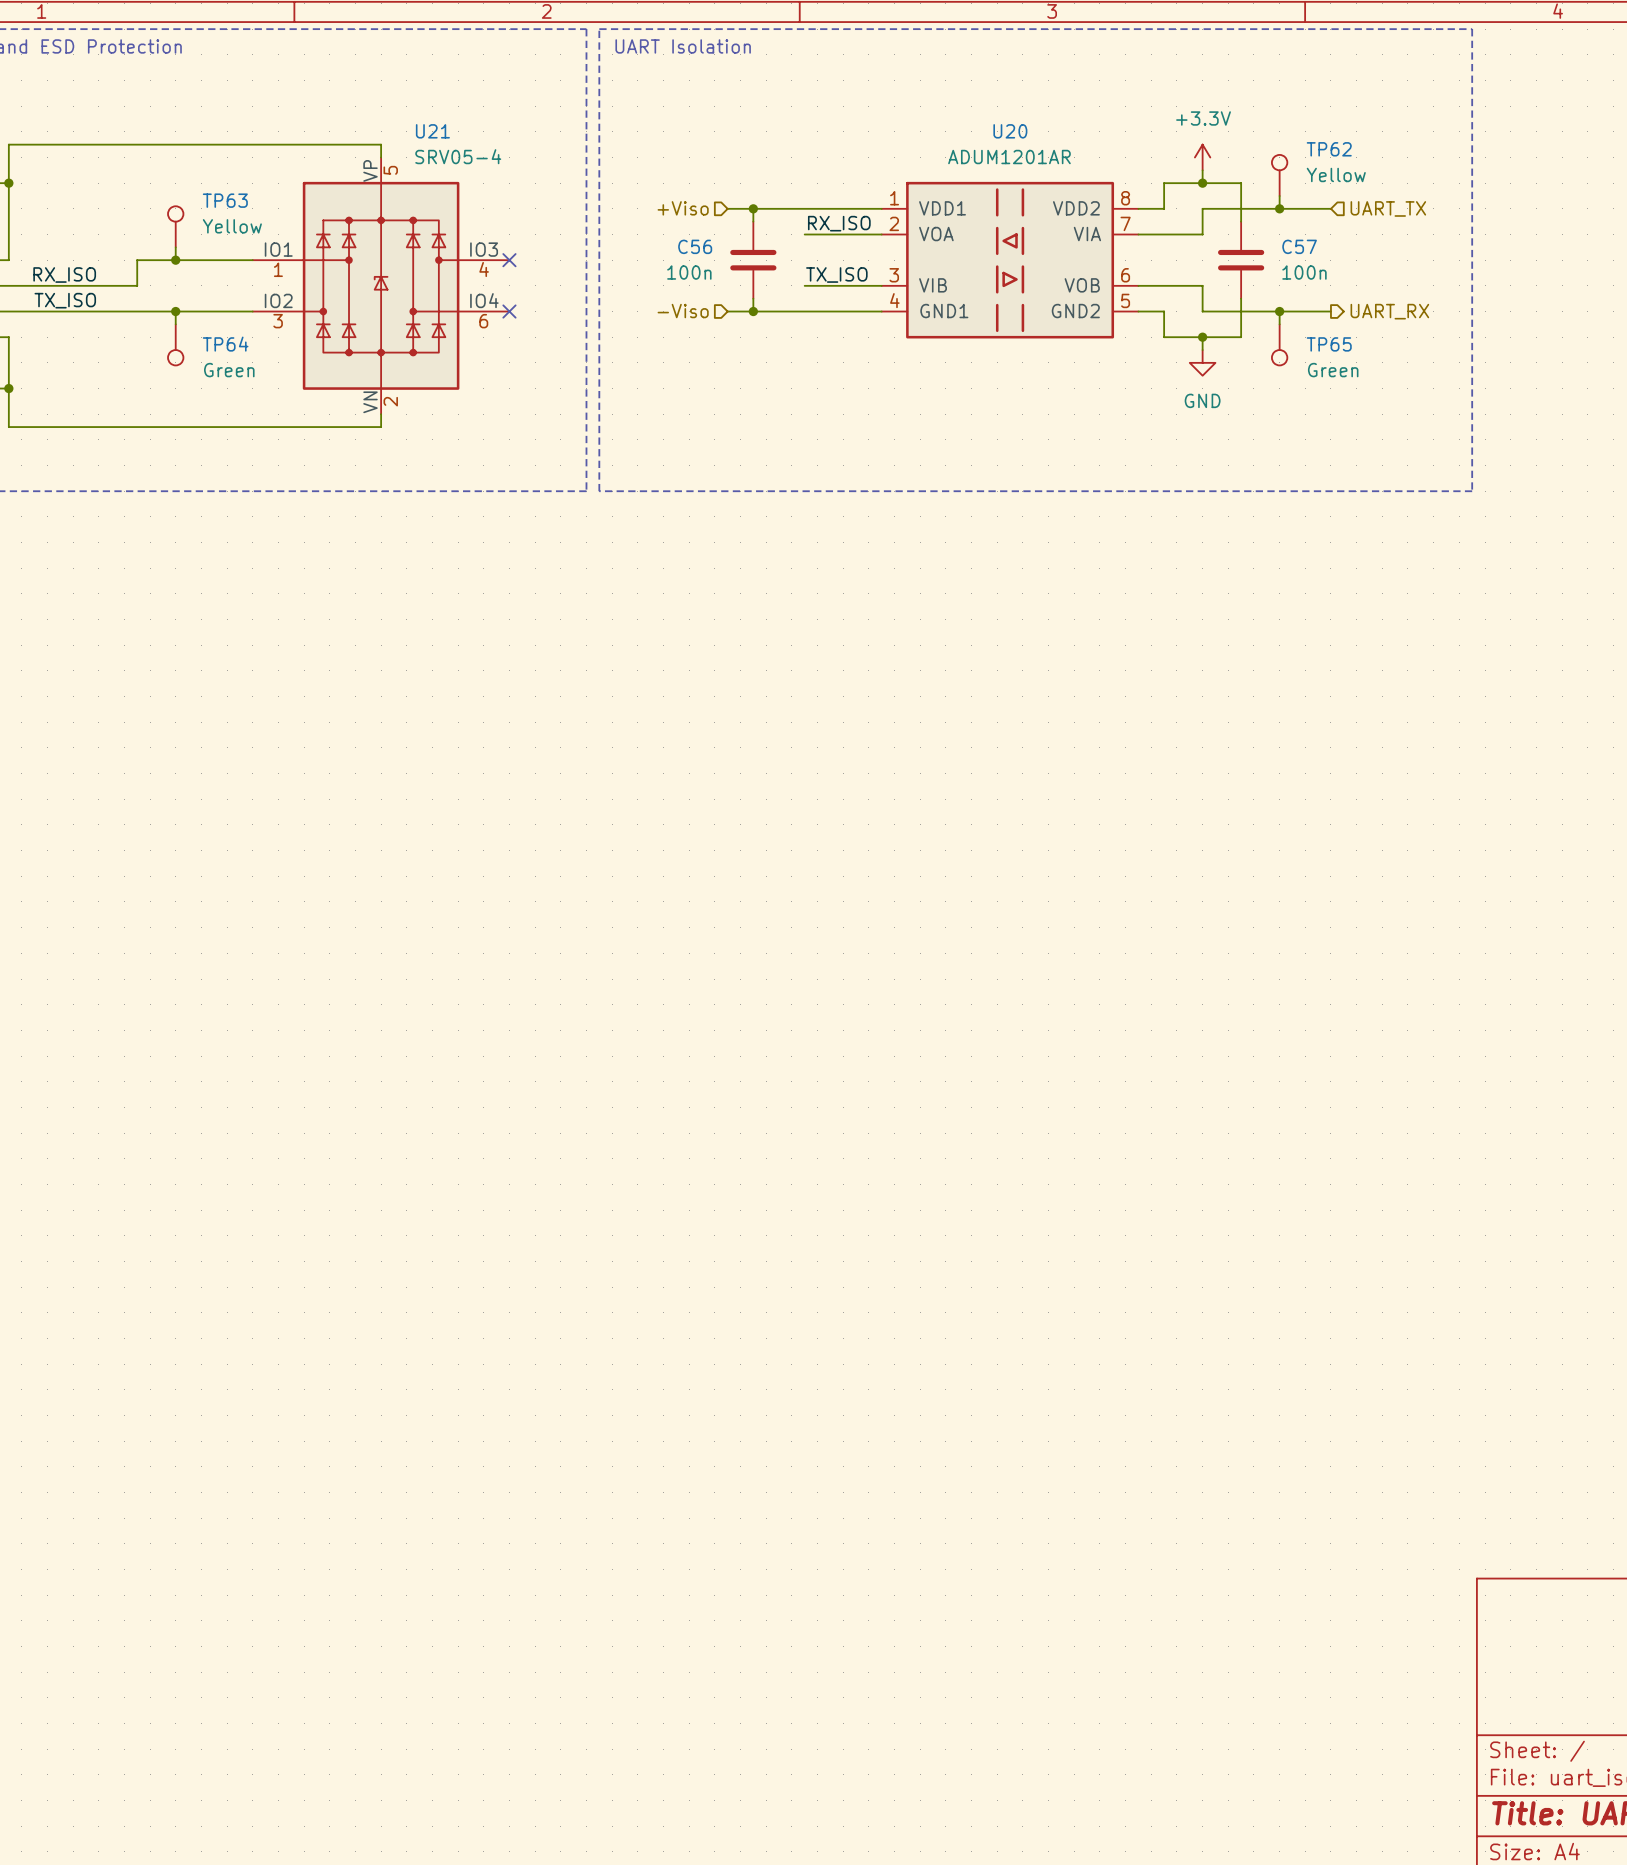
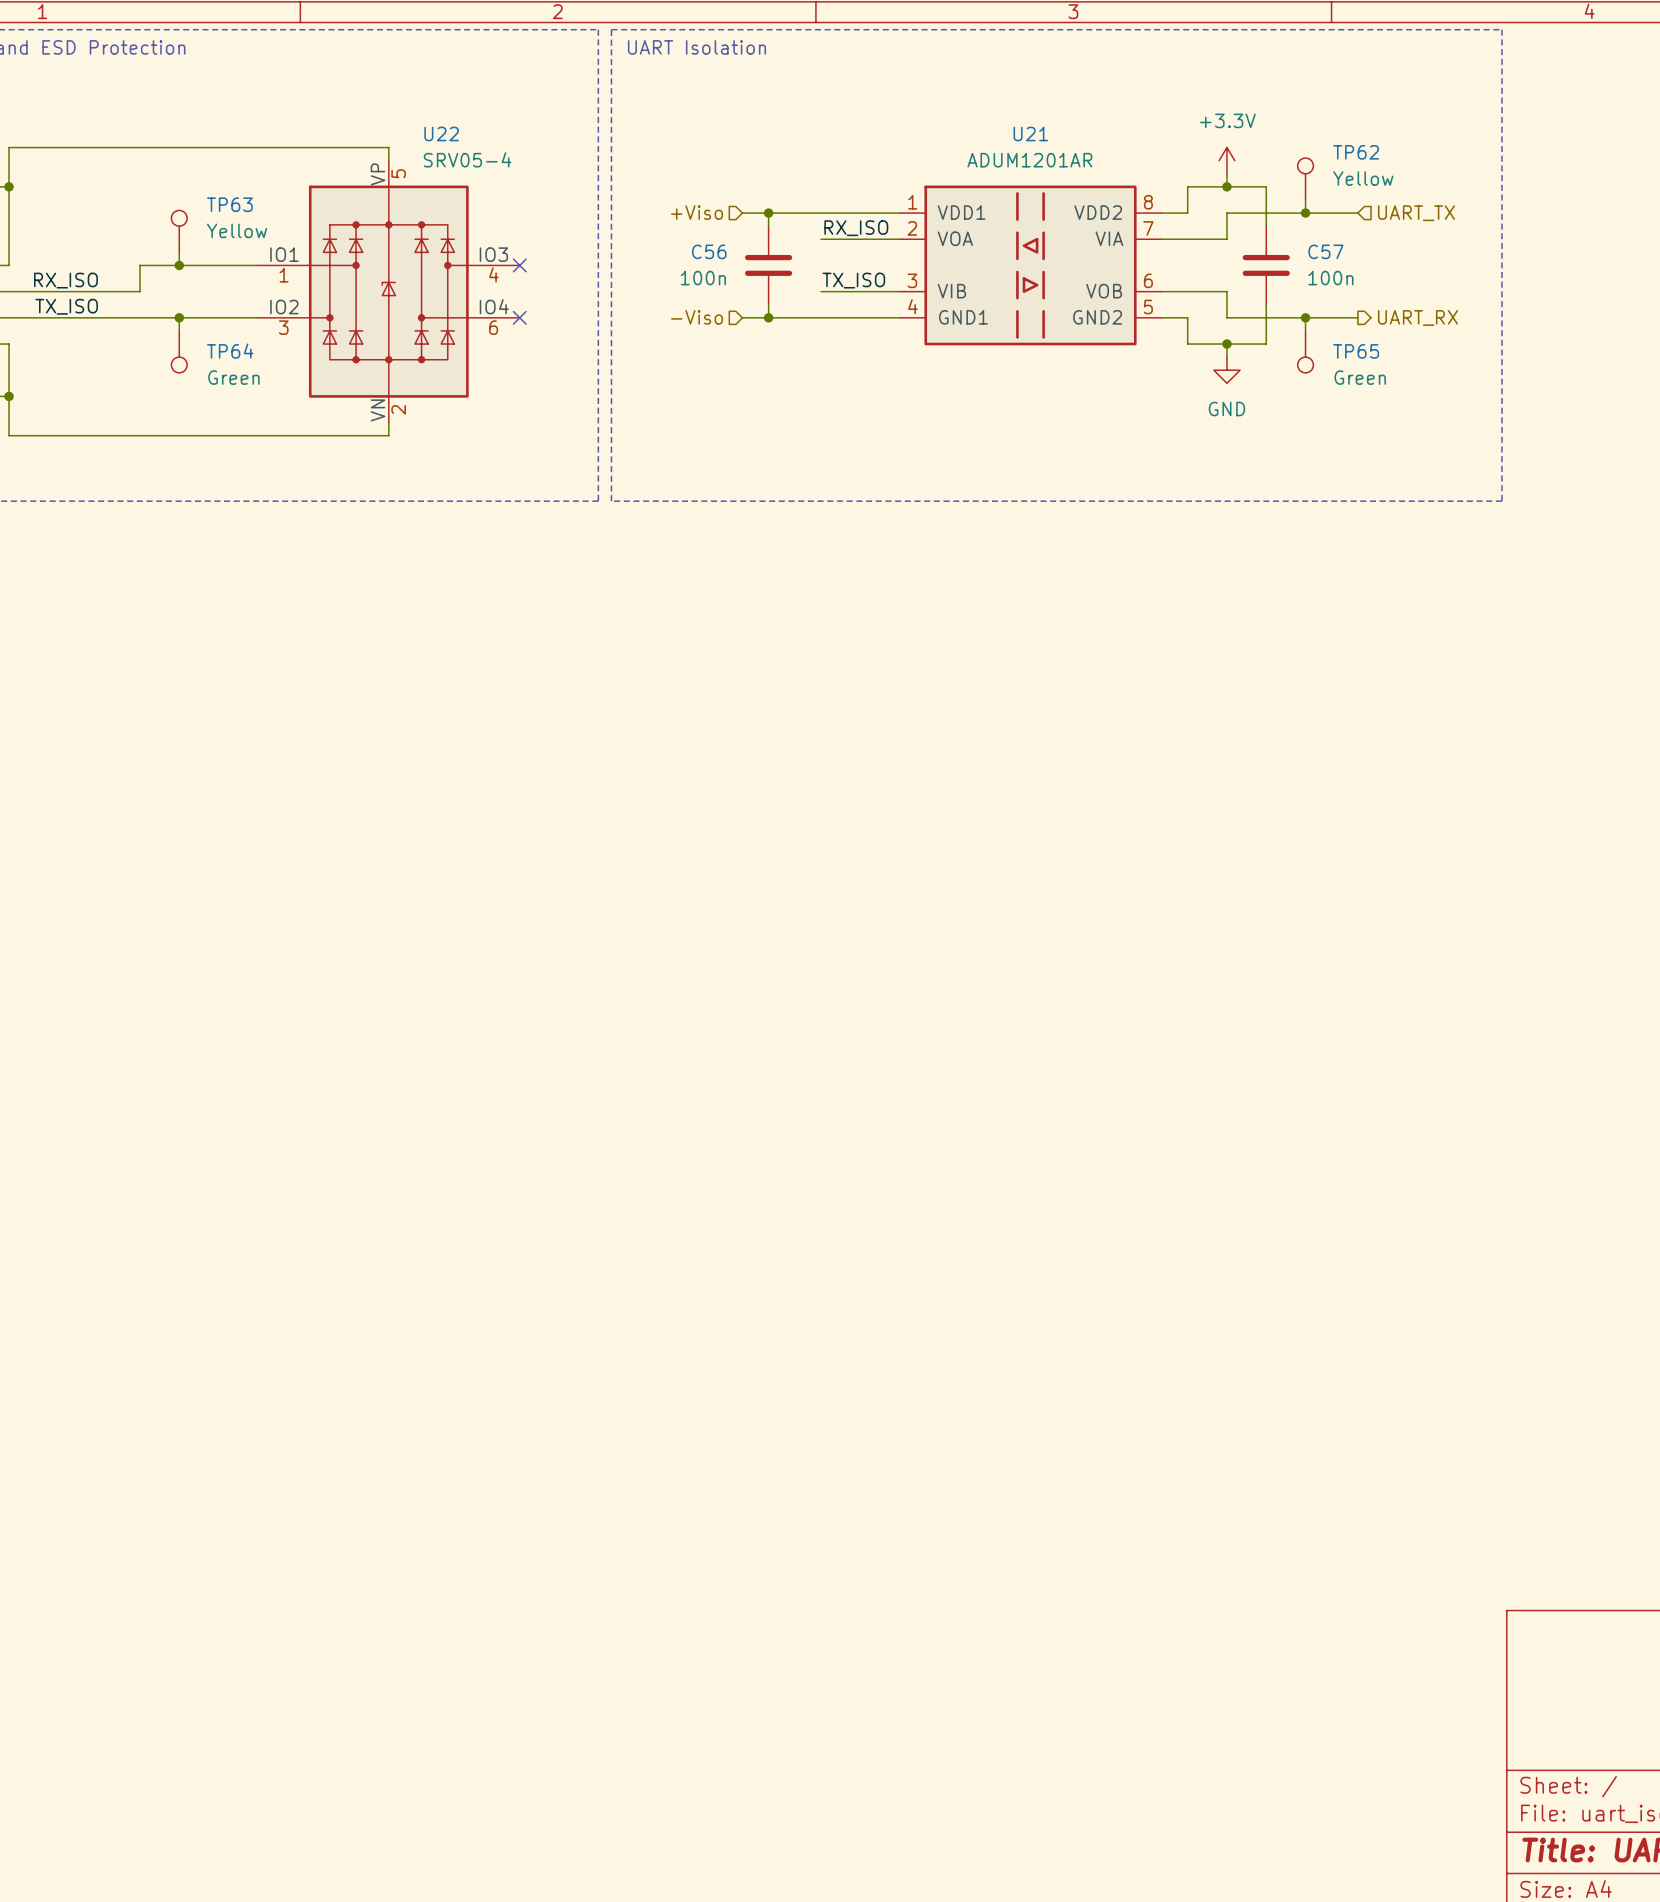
U21 name: U21 (432, 131) -> U22 (441, 133)
U20 name: U20 (1010, 131) -> U21 (1030, 133)

